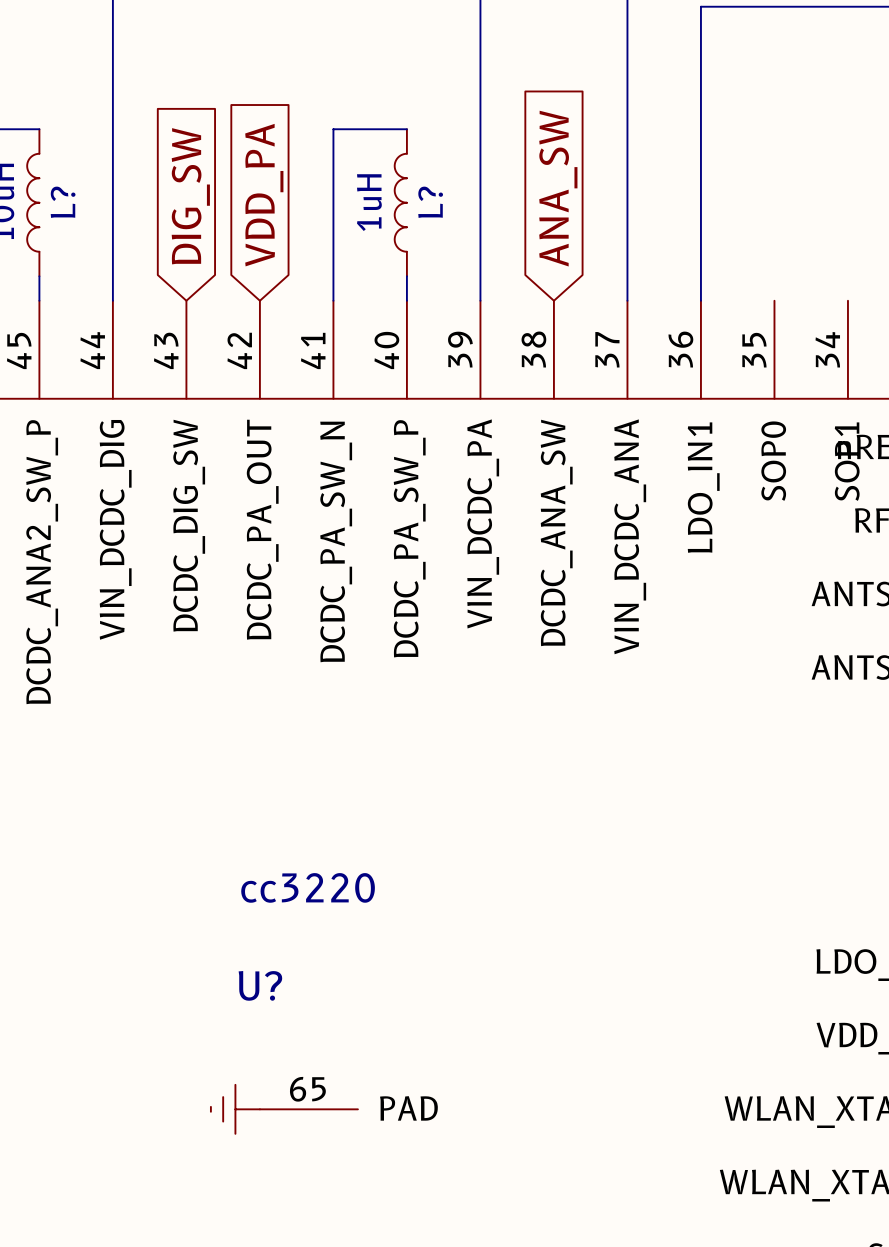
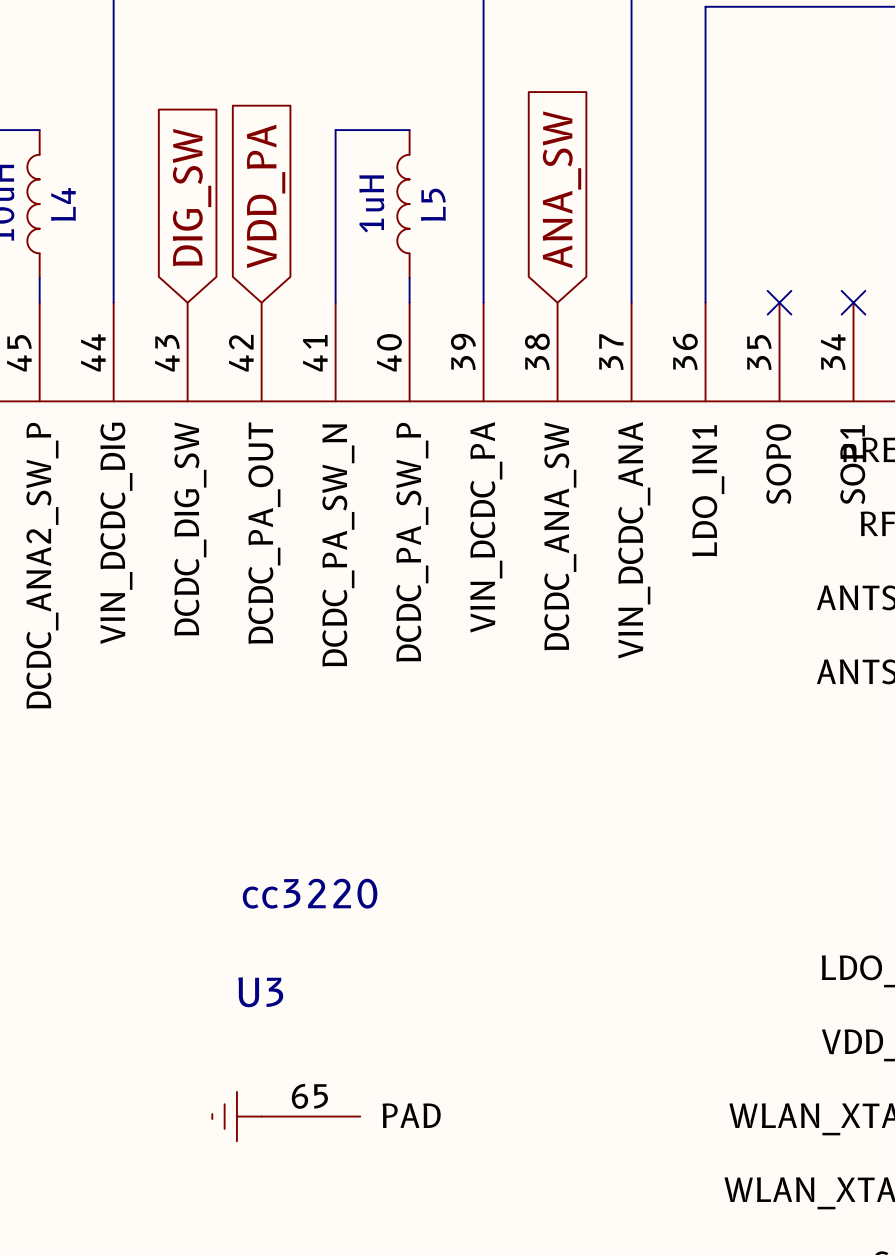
L? name: L? (63, 202) -> L4 (63, 204)
L? name: L? (430, 202) -> L5 (433, 204)
no-connect mark: none -> (779, 302)
no-connect mark: none -> (853, 302)
U? name: U? (260, 985) -> U3 (260, 992)

